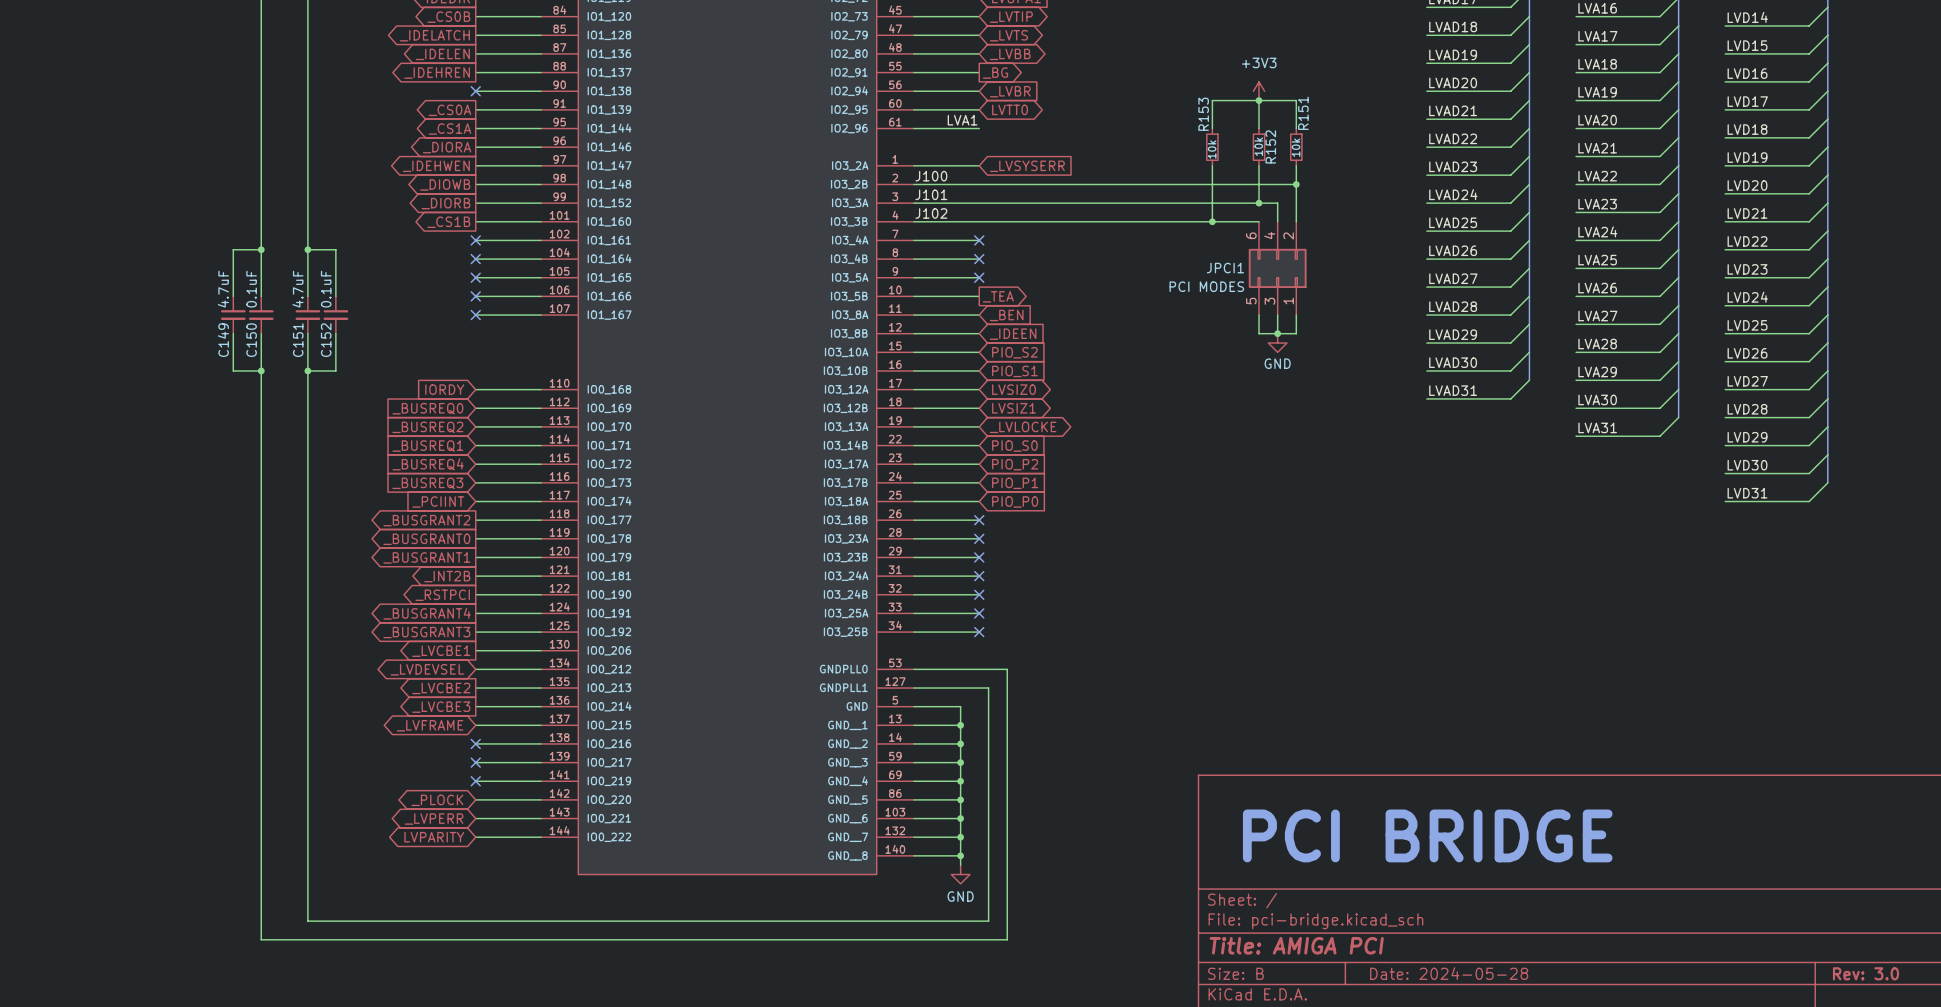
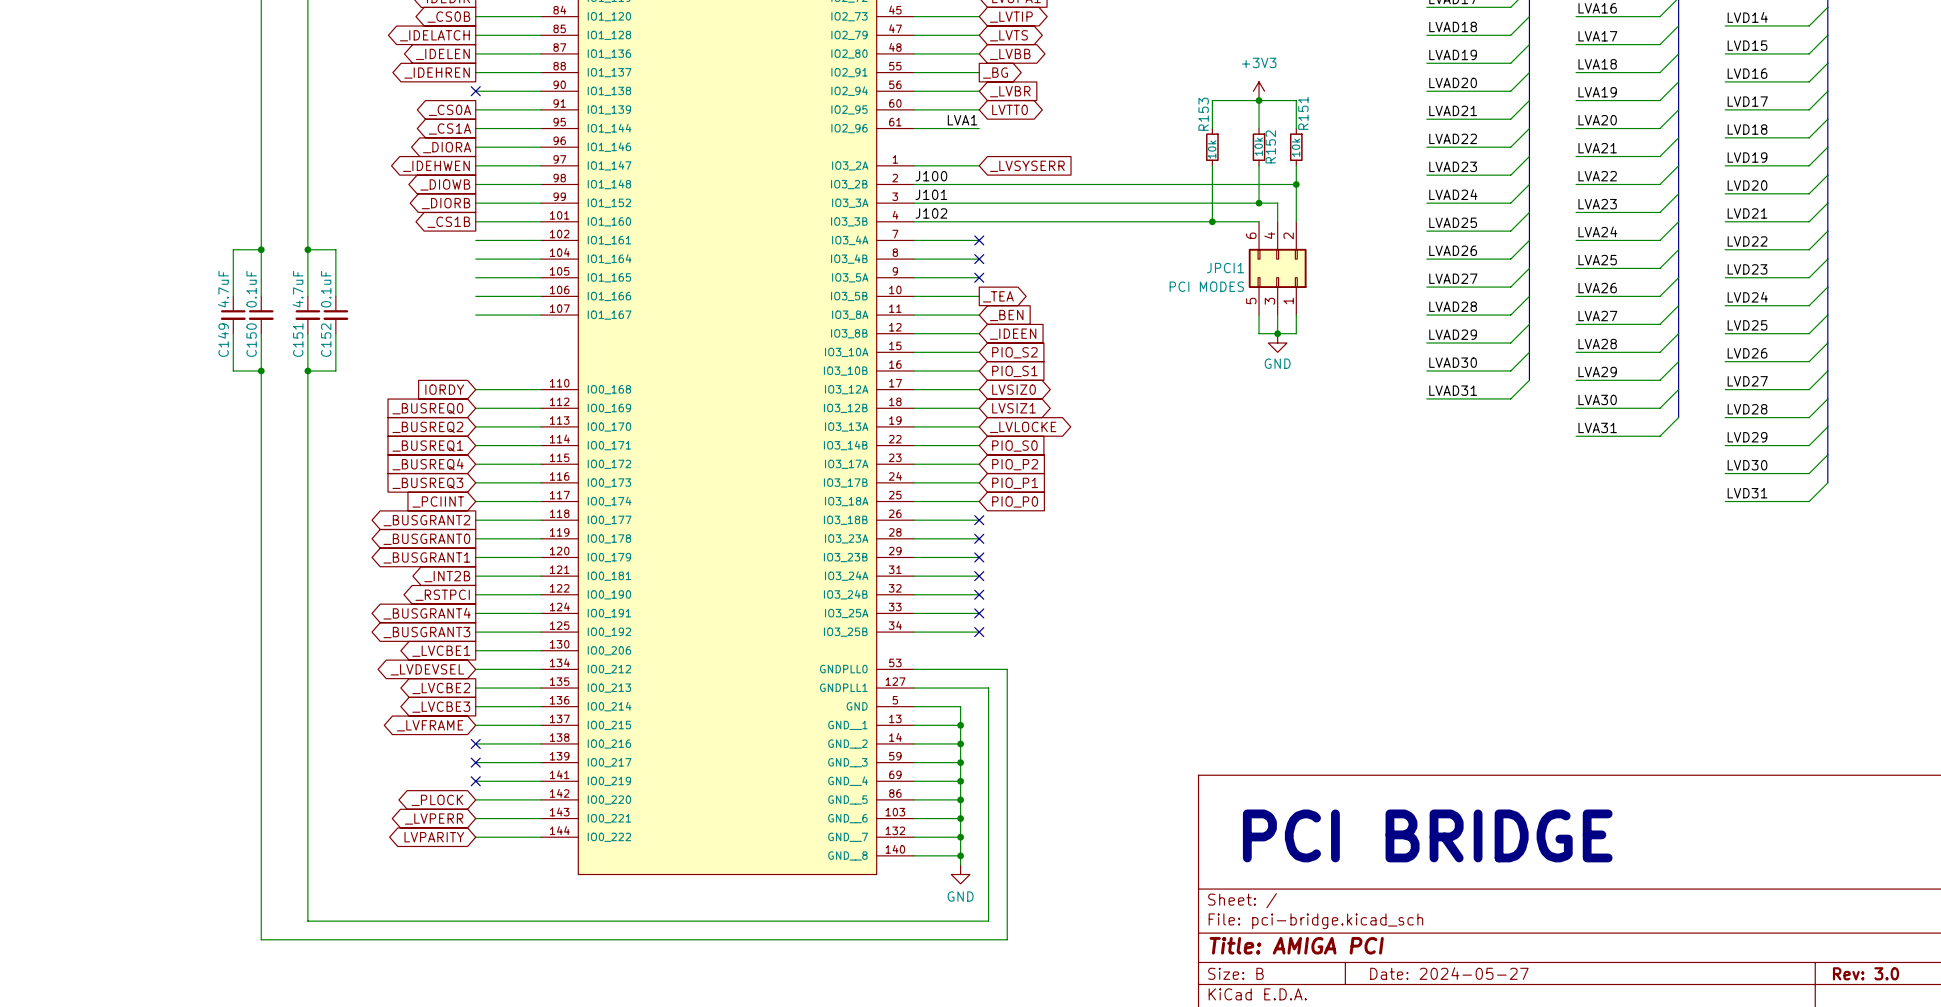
no-connect mark: (475, 240) -> none
no-connect mark: (475, 259) -> none
no-connect mark: (475, 277) -> none
no-connect mark: (475, 296) -> none
no-connect mark: (475, 315) -> none
title block: Date: 2024-05-28 (1449, 973) -> Date: 2024-05-27 (1449, 973)

